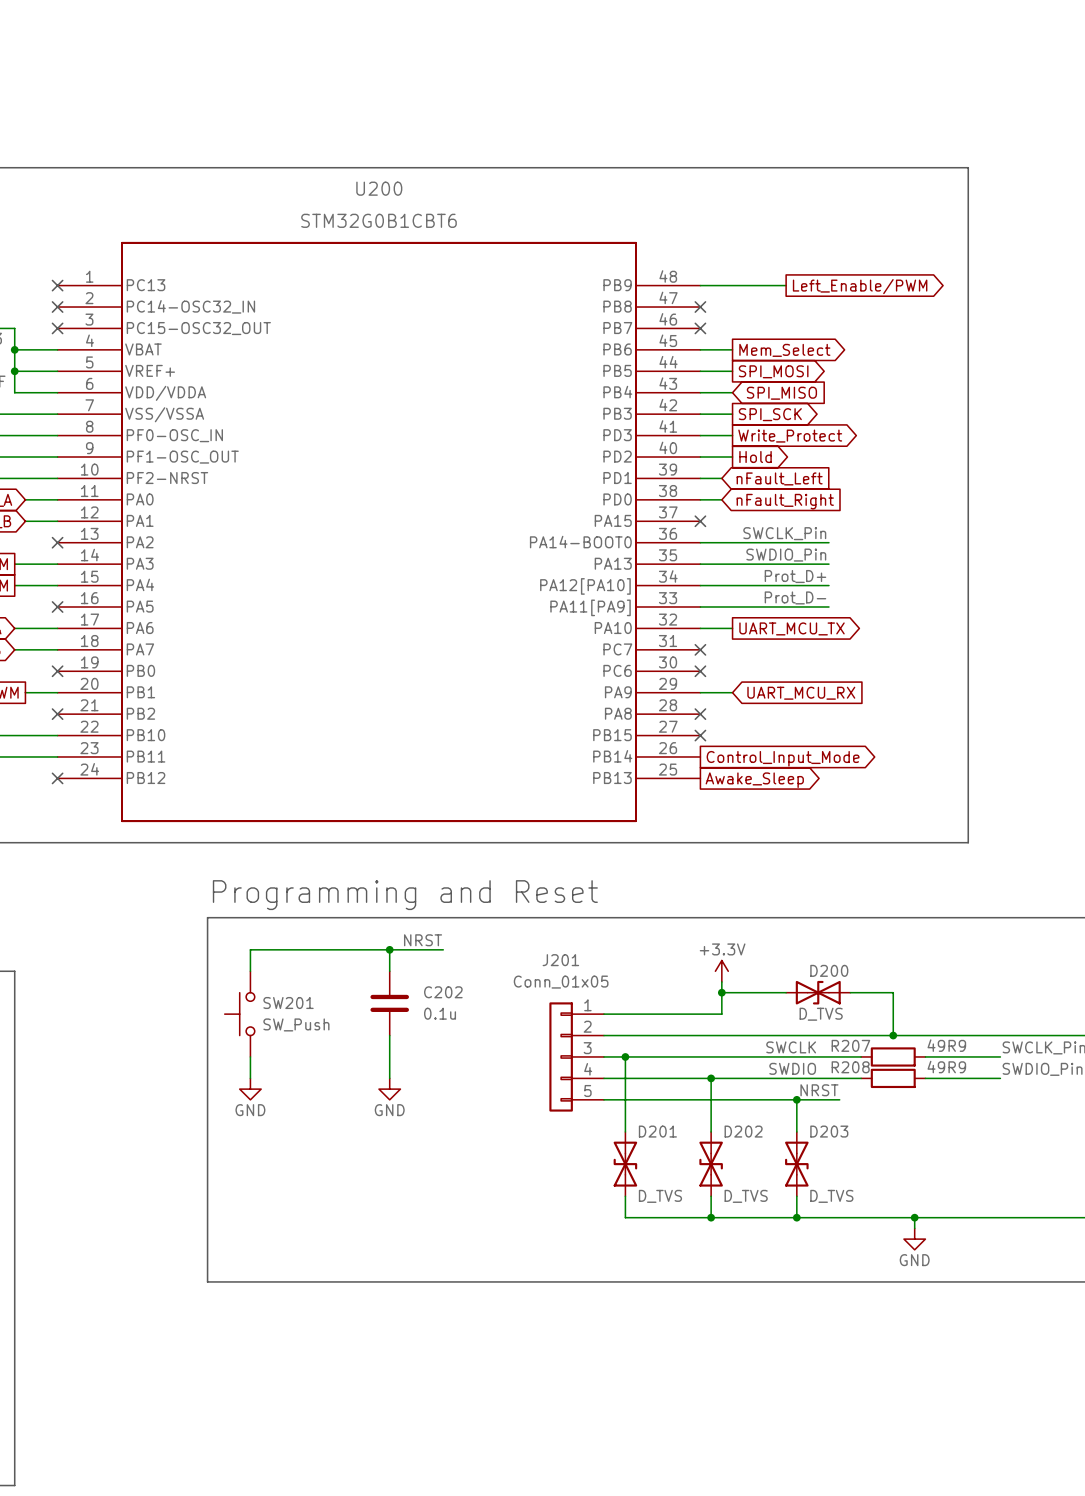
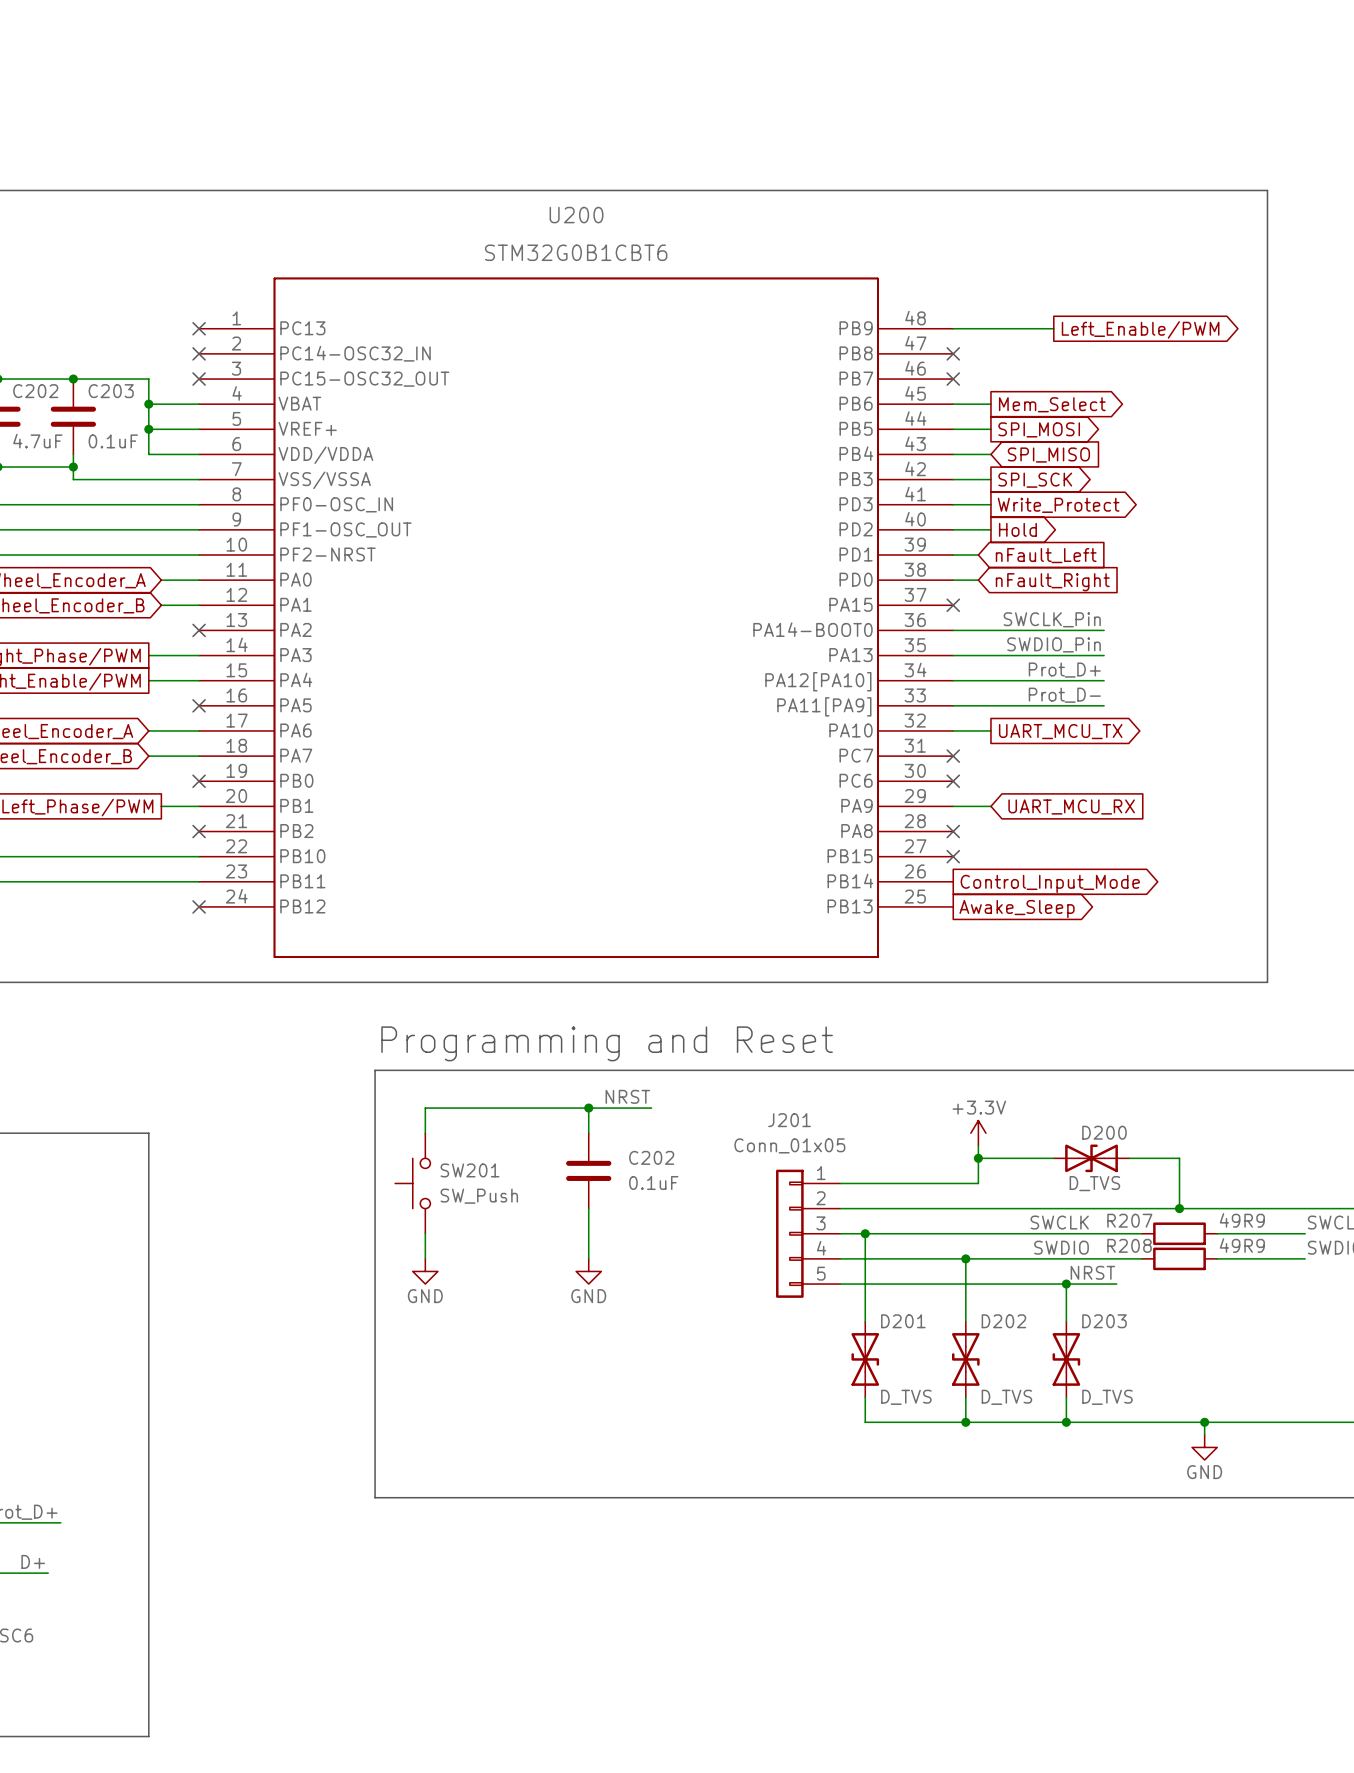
C202 value: 0.1u (440, 1013) -> 0.1uF (653, 1183)

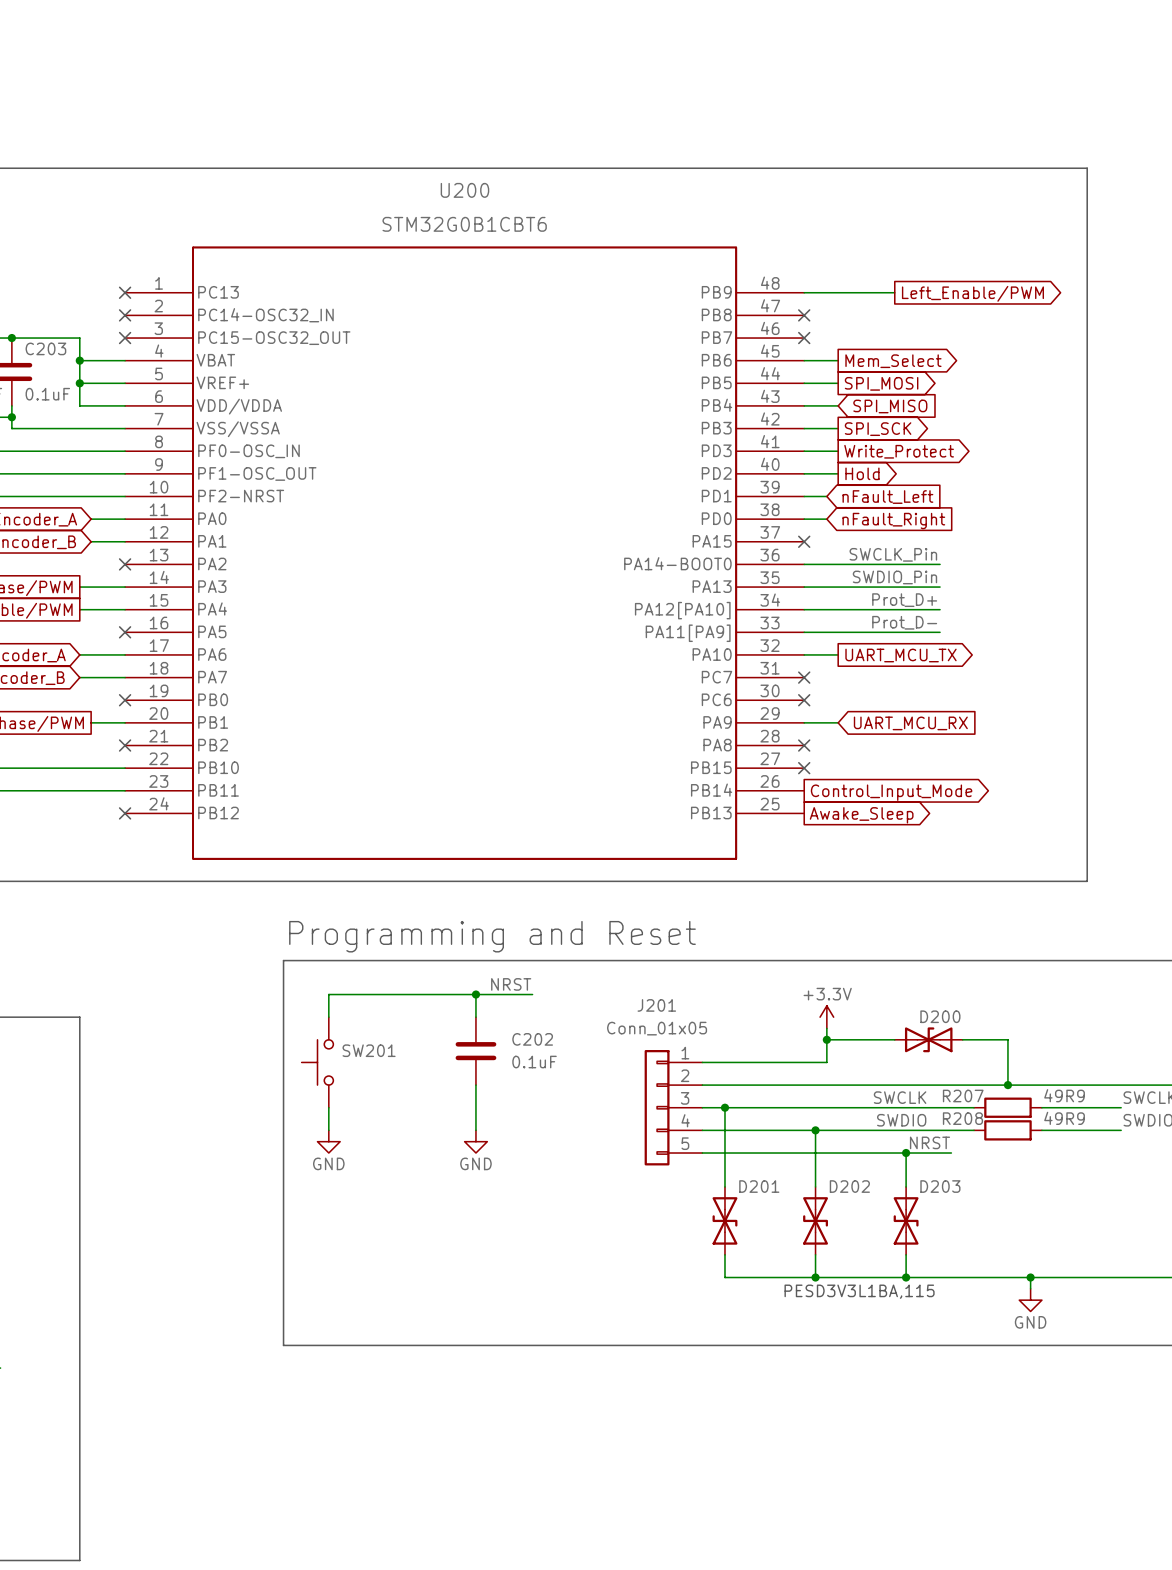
D200 value: D_TVS (1094, 1183) -> none
SW201 value: SW_Push (479, 1196) -> none
D201 value: D_TVS (906, 1397) -> none
D202 value: D_TVS (1006, 1397) -> none
D203 value: D_TVS (1107, 1397) -> none
text: none -> PESD3V3L1BA,115 (859, 1291)

